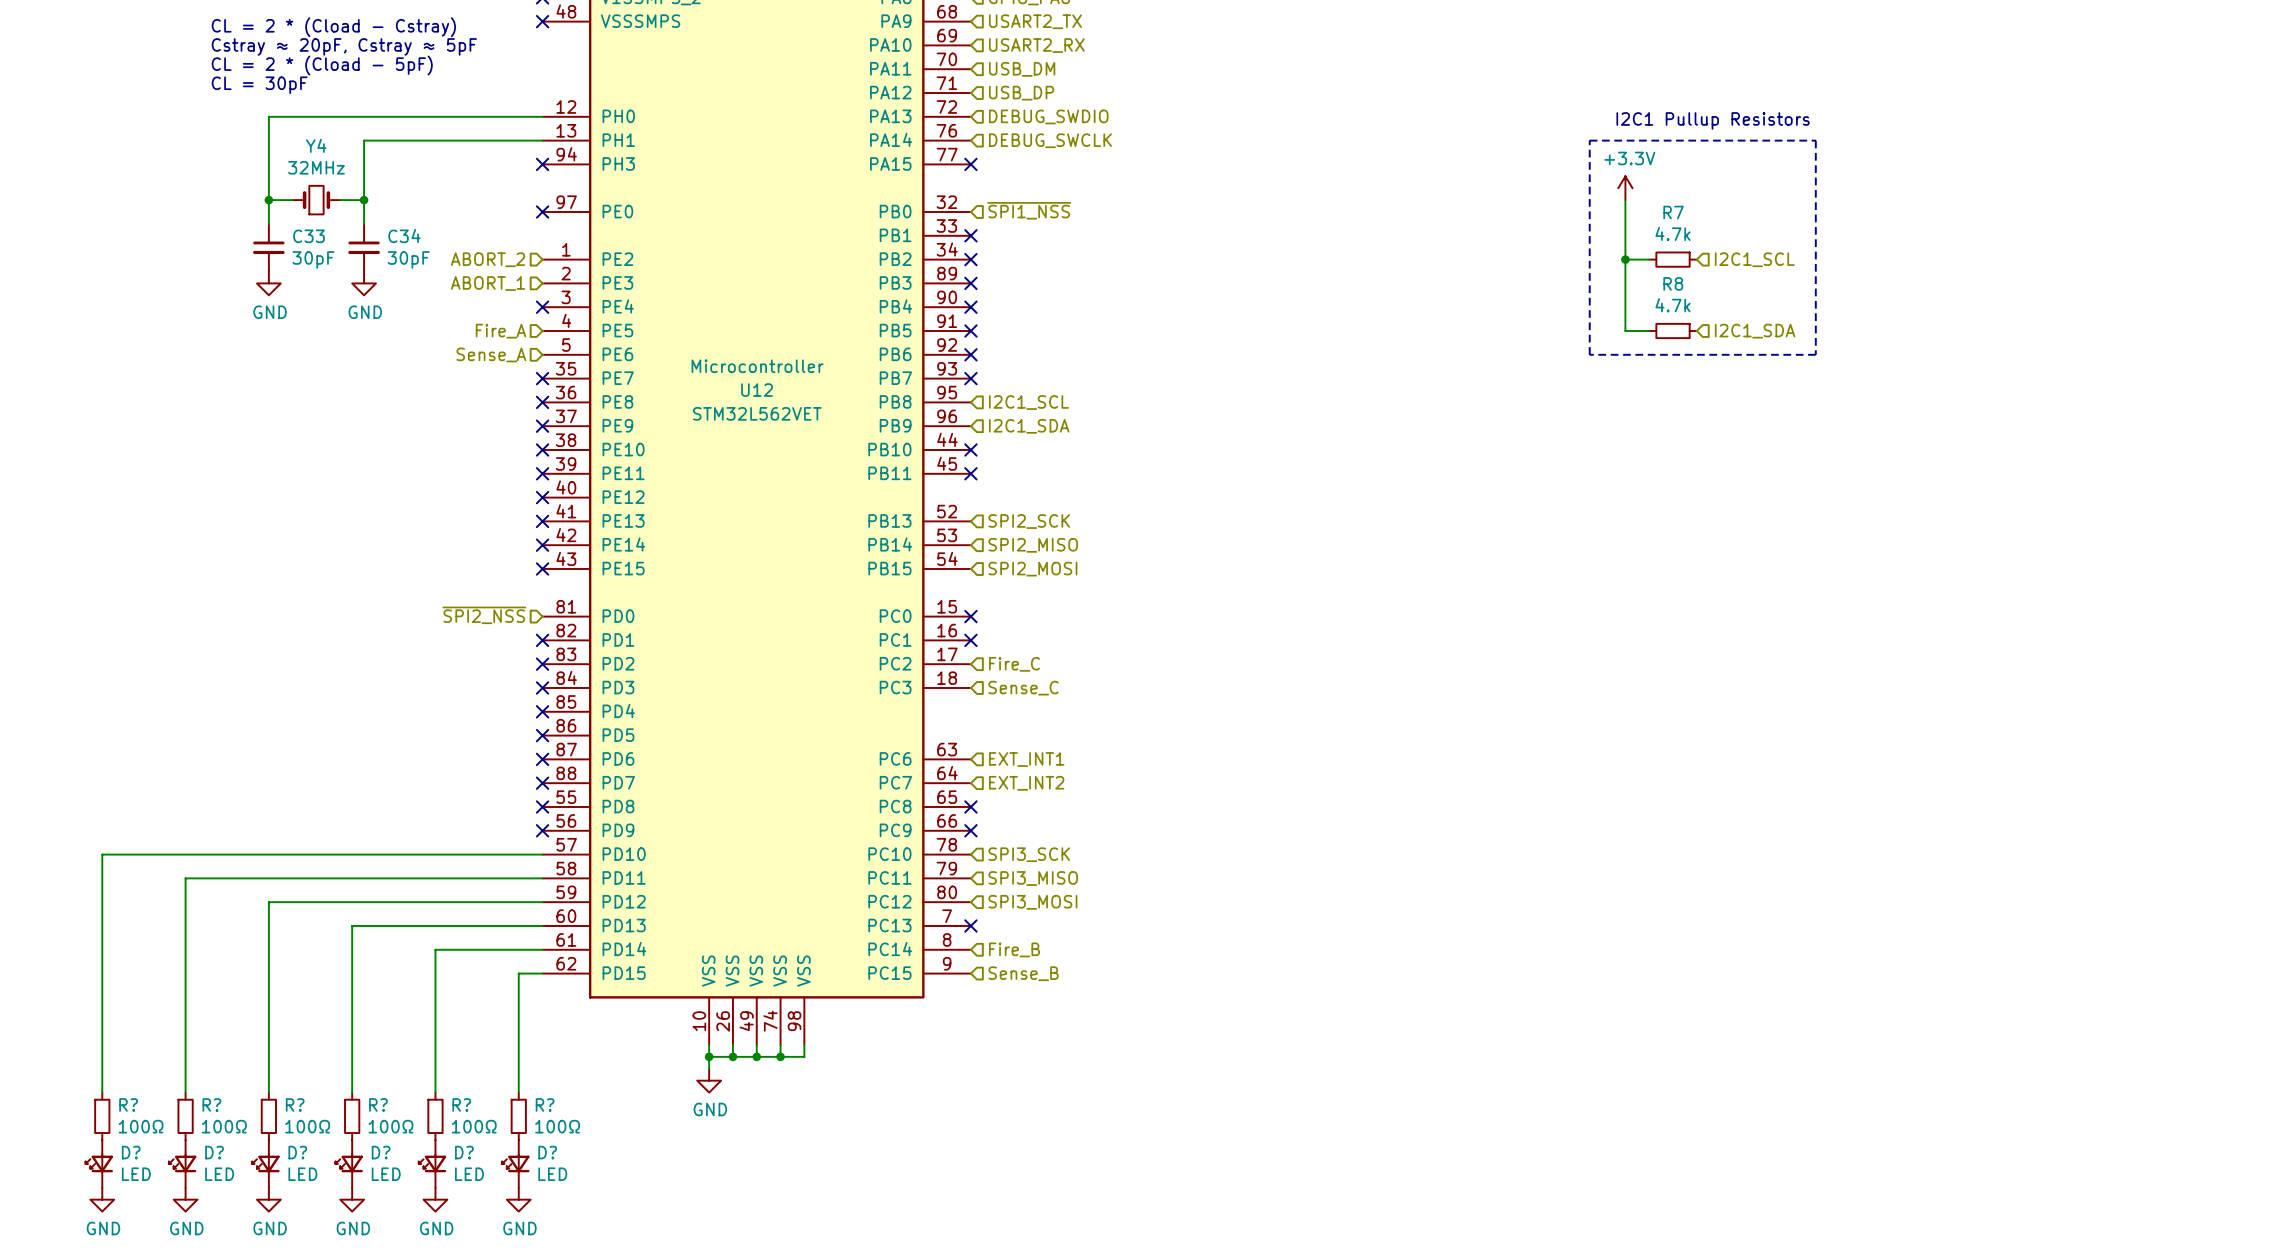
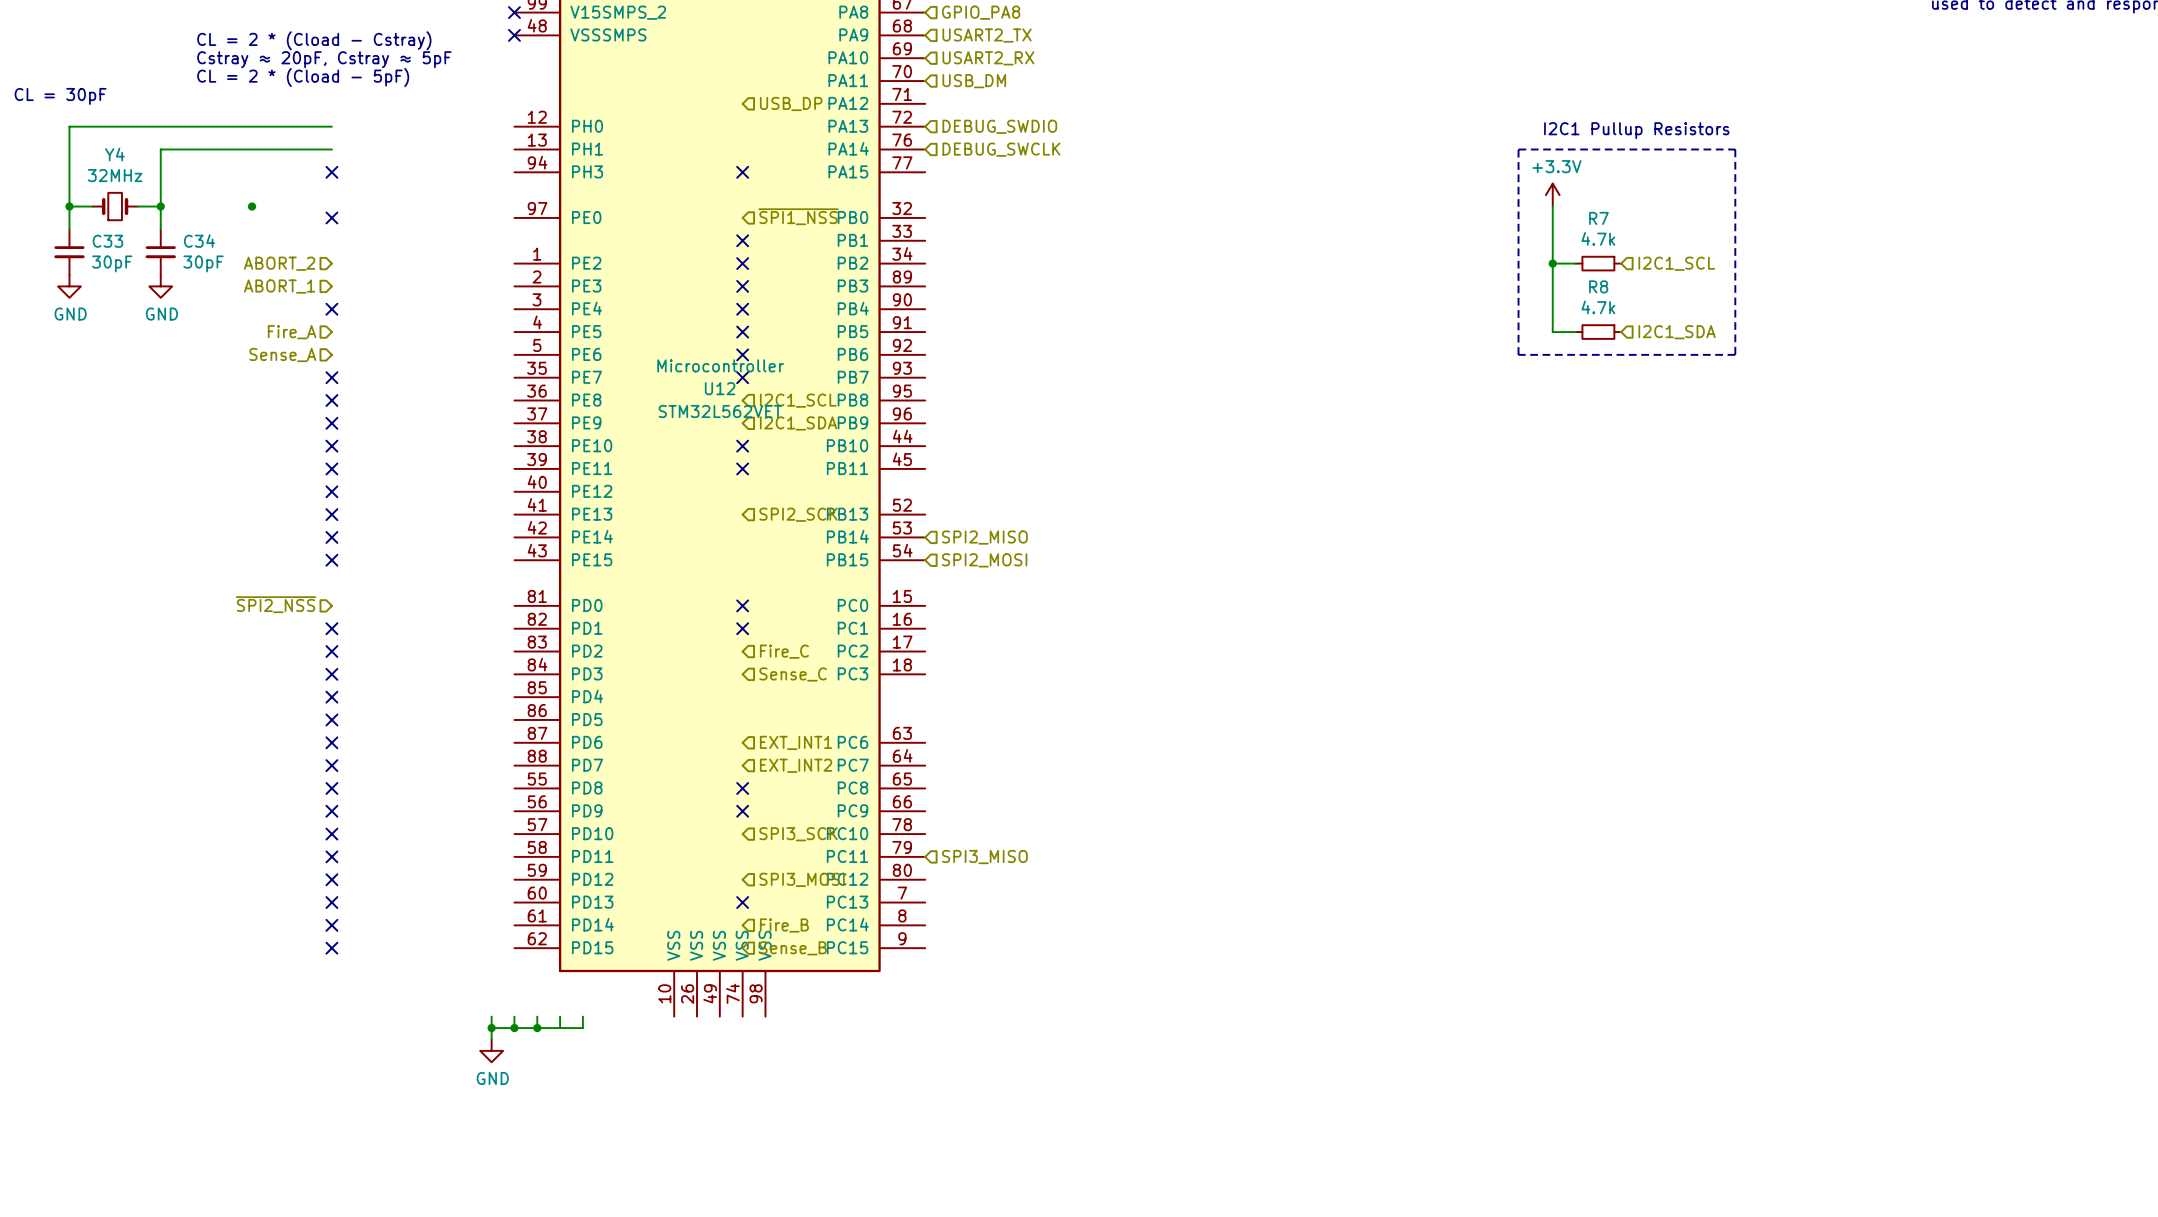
text position: CL = 30pF (259, 85) -> CL = 30pF (60, 96)
hierarchical label position: USB_DP (1021, 93) -> USB_DP (791, 103)
wire: (268, 116) (268, 223) -> (252, 126) (69, 126) (69, 229)
wire: (352, 116) (542, 116) -> none
wire: (542, 140) (364, 140) (364, 223) -> (331, 149) (160, 149) (160, 229)
no-connect mark: none -> (331, 172)
no-connect mark: (542, 164) -> none
no-connect mark: none -> (742, 172)
no-connect mark: (970, 164) -> none
junction: none -> (69, 206)
junction: none -> (160, 206)
wire: (268, 200) (292, 200) -> (69, 206) (92, 206)
Y4 position: (316, 200) -> (115, 206)
wire: (340, 200) (364, 200) -> (137, 206) (160, 206)
junction: (364, 200) -> none
hierarchical label position: ~{SPI1_NSS} (1029, 210) -> ~{SPI1_NSS} (798, 216)
no-connect mark: none -> (331, 217)
no-connect mark: (542, 212) -> none
no-connect mark: none -> (742, 240)
no-connect mark: (970, 235) -> none
C33 position: (268, 247) -> (69, 252)
C34 position: (364, 247) -> (160, 252)
hierarchical label position: ABORT_2 (487, 259) -> ABORT_2 (279, 263)
no-connect mark: none -> (742, 263)
no-connect mark: (970, 259) -> none
power symbol: none -> GND (69, 286)
power symbol: none -> GND (160, 286)
power symbol: GND (268, 283) -> none
power symbol: GND (364, 283) -> none
hierarchical label position: ABORT_1 (487, 283) -> ABORT_1 (279, 286)
no-connect mark: none -> (742, 286)
no-connect mark: (970, 283) -> none
no-connect mark: none -> (331, 309)
no-connect mark: (542, 307) -> none
no-connect mark: none -> (742, 309)
no-connect mark: (970, 307) -> none
hierarchical label position: Fire_A (501, 331) -> Fire_A (292, 332)
no-connect mark: none -> (742, 332)
no-connect mark: (970, 331) -> none
hierarchical label position: Sense_A (491, 354) -> Sense_A (282, 354)
no-connect mark: none -> (742, 354)
no-connect mark: (970, 354) -> none
no-connect mark: none -> (331, 377)
no-connect mark: (542, 378) -> none
no-connect mark: none -> (742, 377)
no-connect mark: (970, 378) -> none
no-connect mark: none -> (331, 400)
no-connect mark: (542, 402) -> none
hierarchical label position: I2C1_SCL (1028, 402) -> I2C1_SCL (798, 400)
no-connect mark: none -> (331, 423)
no-connect mark: (542, 426) -> none
hierarchical label position: I2C1_SDA (1029, 426) -> I2C1_SDA (798, 423)
no-connect mark: none -> (331, 446)
no-connect mark: (542, 450) -> none
no-connect mark: none -> (742, 446)
no-connect mark: (970, 450) -> none
no-connect mark: none -> (331, 468)
no-connect mark: (542, 473) -> none
no-connect mark: none -> (742, 468)
no-connect mark: (970, 473) -> none
no-connect mark: none -> (331, 491)
no-connect mark: (542, 497) -> none
no-connect mark: none -> (331, 514)
no-connect mark: (542, 521) -> none
hierarchical label position: SPI2_SCK (1029, 521) -> SPI2_SCK (798, 514)
no-connect mark: none -> (331, 537)
no-connect mark: (542, 545) -> none
no-connect mark: none -> (331, 560)
no-connect mark: (542, 568) -> none
hierarchical label position: ~{SPI2_NSS} (484, 615) -> ~{SPI2_NSS} (276, 604)
no-connect mark: none -> (742, 605)
no-connect mark: (970, 616) -> none
no-connect mark: none -> (331, 628)
no-connect mark: (542, 640) -> none
no-connect mark: none -> (742, 628)
no-connect mark: (970, 640) -> none
no-connect mark: none -> (331, 651)
no-connect mark: (542, 664) -> none
hierarchical label position: Fire_C (1014, 664) -> Fire_C (784, 651)
no-connect mark: none -> (331, 674)
no-connect mark: (542, 687) -> none
hierarchical label position: Sense_C (1023, 688) -> Sense_C (793, 674)
no-connect mark: none -> (331, 697)
no-connect mark: (542, 711) -> none
no-connect mark: none -> (331, 719)
no-connect mark: (542, 735) -> none
no-connect mark: none -> (331, 742)
no-connect mark: (542, 759) -> none
hierarchical label position: EXT_INT1 (1026, 759) -> EXT_INT1 (796, 742)
no-connect mark: none -> (331, 765)
no-connect mark: (542, 783) -> none
hierarchical label position: EXT_INT2 (1026, 783) -> EXT_INT2 (796, 765)
no-connect mark: none -> (331, 788)
no-connect mark: (542, 806) -> none
no-connect mark: none -> (742, 788)
no-connect mark: (970, 806) -> none
no-connect mark: none -> (331, 811)
no-connect mark: (542, 830) -> none
no-connect mark: none -> (742, 811)
no-connect mark: (970, 830) -> none
no-connect mark: none -> (331, 834)
wire: (542, 854) (102, 854) (102, 1092) -> none
hierarchical label position: SPI3_SCK (1029, 854) -> SPI3_SCK (798, 834)
no-connect mark: none -> (331, 856)
wire: (542, 878) (185, 878) (185, 1092) -> none
no-connect mark: none -> (331, 879)
wire: (542, 902) (268, 902) (268, 1092) -> none
hierarchical label position: SPI3_MOSI (1032, 902) -> SPI3_MOSI (802, 879)
no-connect mark: none -> (331, 902)
wire: (542, 925) (352, 925) (352, 1092) -> none
no-connect mark: none -> (742, 902)
no-connect mark: (970, 925) -> none
no-connect mark: none -> (331, 925)
wire: (542, 949) (435, 949) (435, 1092) -> none
hierarchical label position: Fire_B (1014, 949) -> Fire_B (784, 925)
no-connect mark: none -> (331, 948)
wire: (542, 973) (518, 973) (518, 1044) -> none
hierarchical label position: Sense_B (1023, 973) -> Sense_B (793, 948)
wire: (709, 1044) (709, 1068) -> none
wire: (732, 1044) (732, 1056) -> (514, 1016) (514, 1028)
wire: (756, 1044) (756, 1056) -> (537, 1016) (537, 1028)
wire: (780, 1044) (780, 1056) -> (560, 1016) (560, 1028)
wire: (804, 1044) (804, 1056) (709, 1056) -> (582, 1016) (582, 1028) (491, 1028)
junction: none -> (491, 1028)
junction: none -> (514, 1028)
junction: none -> (537, 1028)
junction: (709, 1056) -> none
junction: (732, 1056) -> none
junction: (756, 1056) -> none
junction: (780, 1056) -> none
power symbol: none -> GND (491, 1050)
power symbol: GND (709, 1080) -> none
R?: 100Ω (102, 1116) -> none
R?: 100Ω (185, 1116) -> none
R?: 100Ω (268, 1116) -> none
R?: 100Ω (352, 1116) -> none
R?: 100Ω (435, 1116) -> none
R?: 100Ω (518, 1116) -> none
D?: LED (99, 1163) -> none
D?: LED (182, 1163) -> none
D?: LED (265, 1163) -> none
D?: LED (349, 1163) -> none
D?: LED (432, 1163) -> none
D?: LED (515, 1163) -> none
power symbol: GND (102, 1199) -> none
power symbol: GND (185, 1199) -> none
power symbol: GND (268, 1199) -> none
power symbol: GND (352, 1199) -> none
power symbol: GND (435, 1199) -> none
power symbol: GND (518, 1199) -> none

